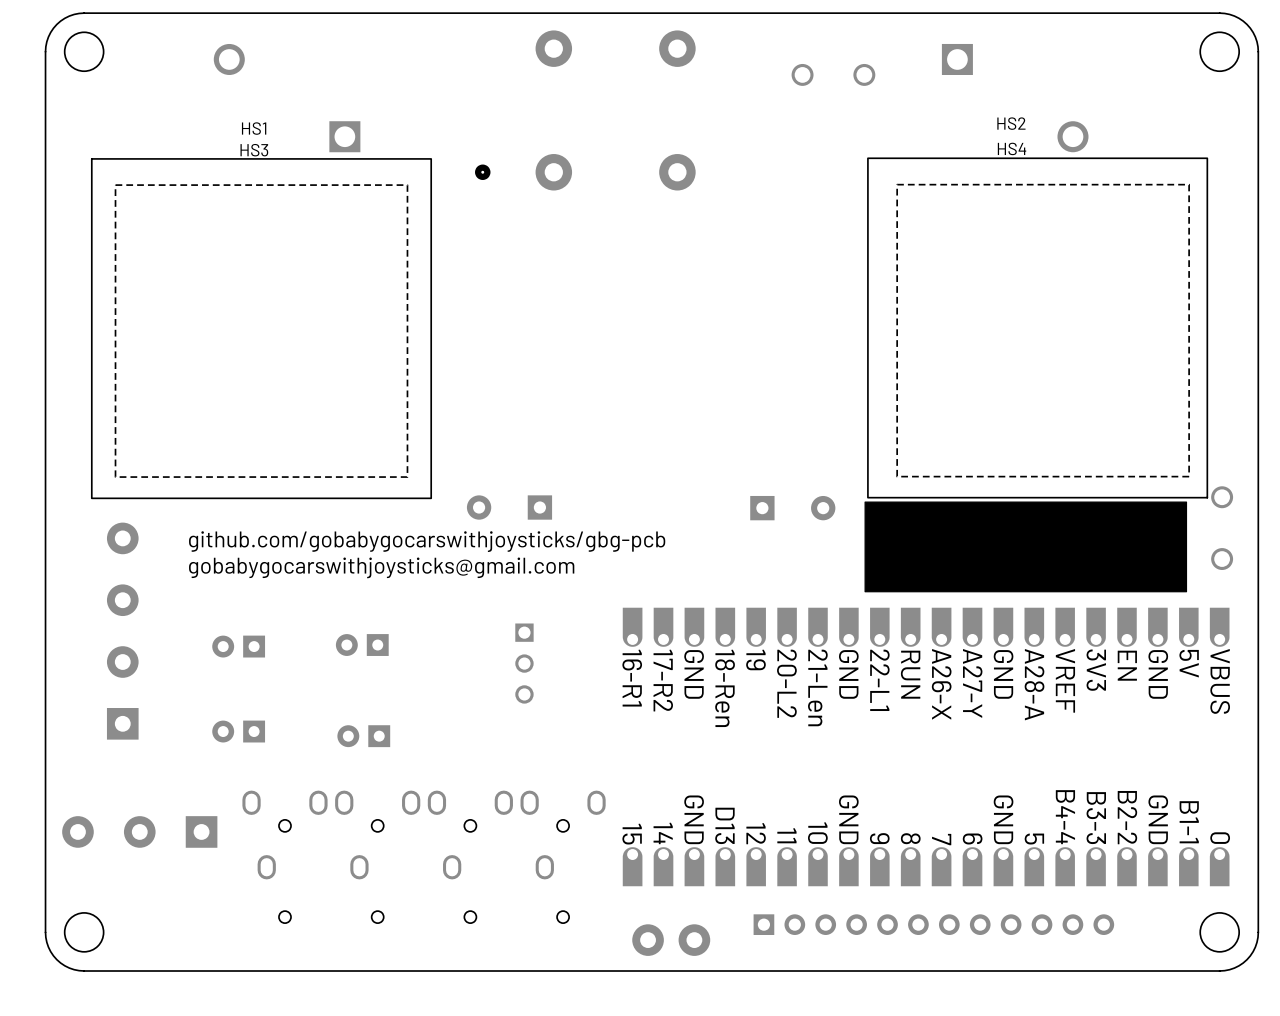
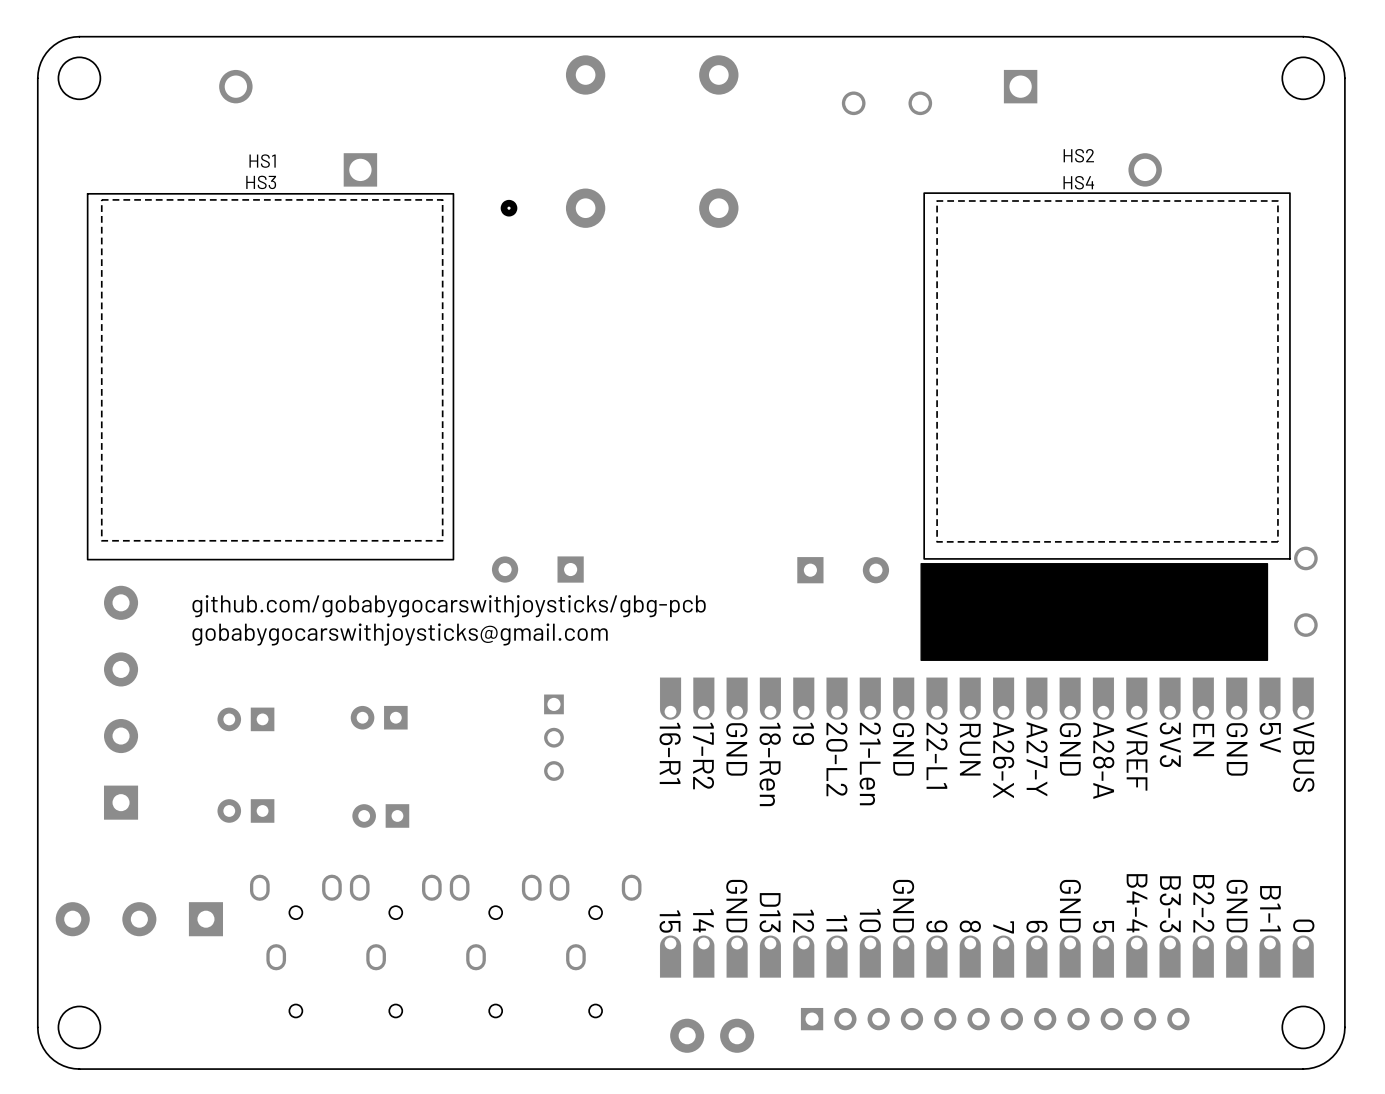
HS3 footprint: [114, 184, 409, 478] -> [101, 199, 444, 542]
HS4 footprint: [896, 184, 1190, 478] -> [936, 200, 1279, 543]

